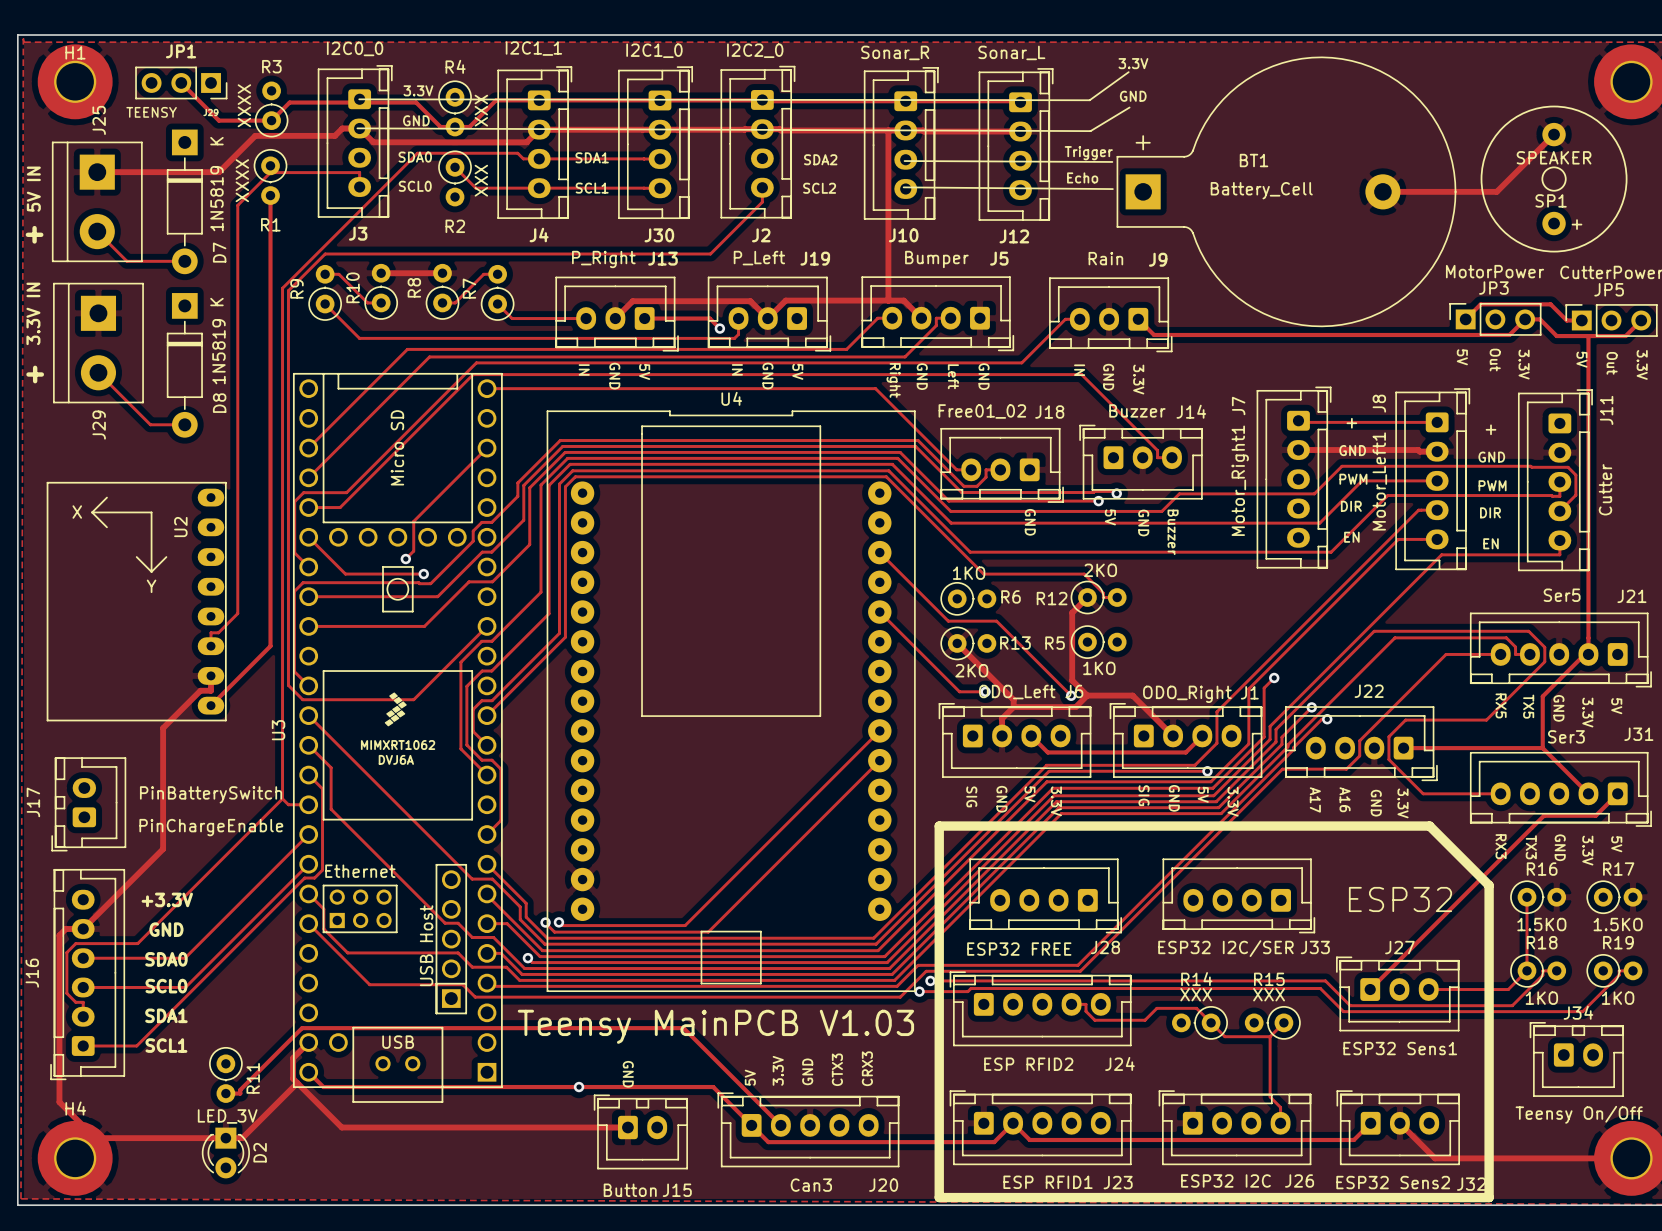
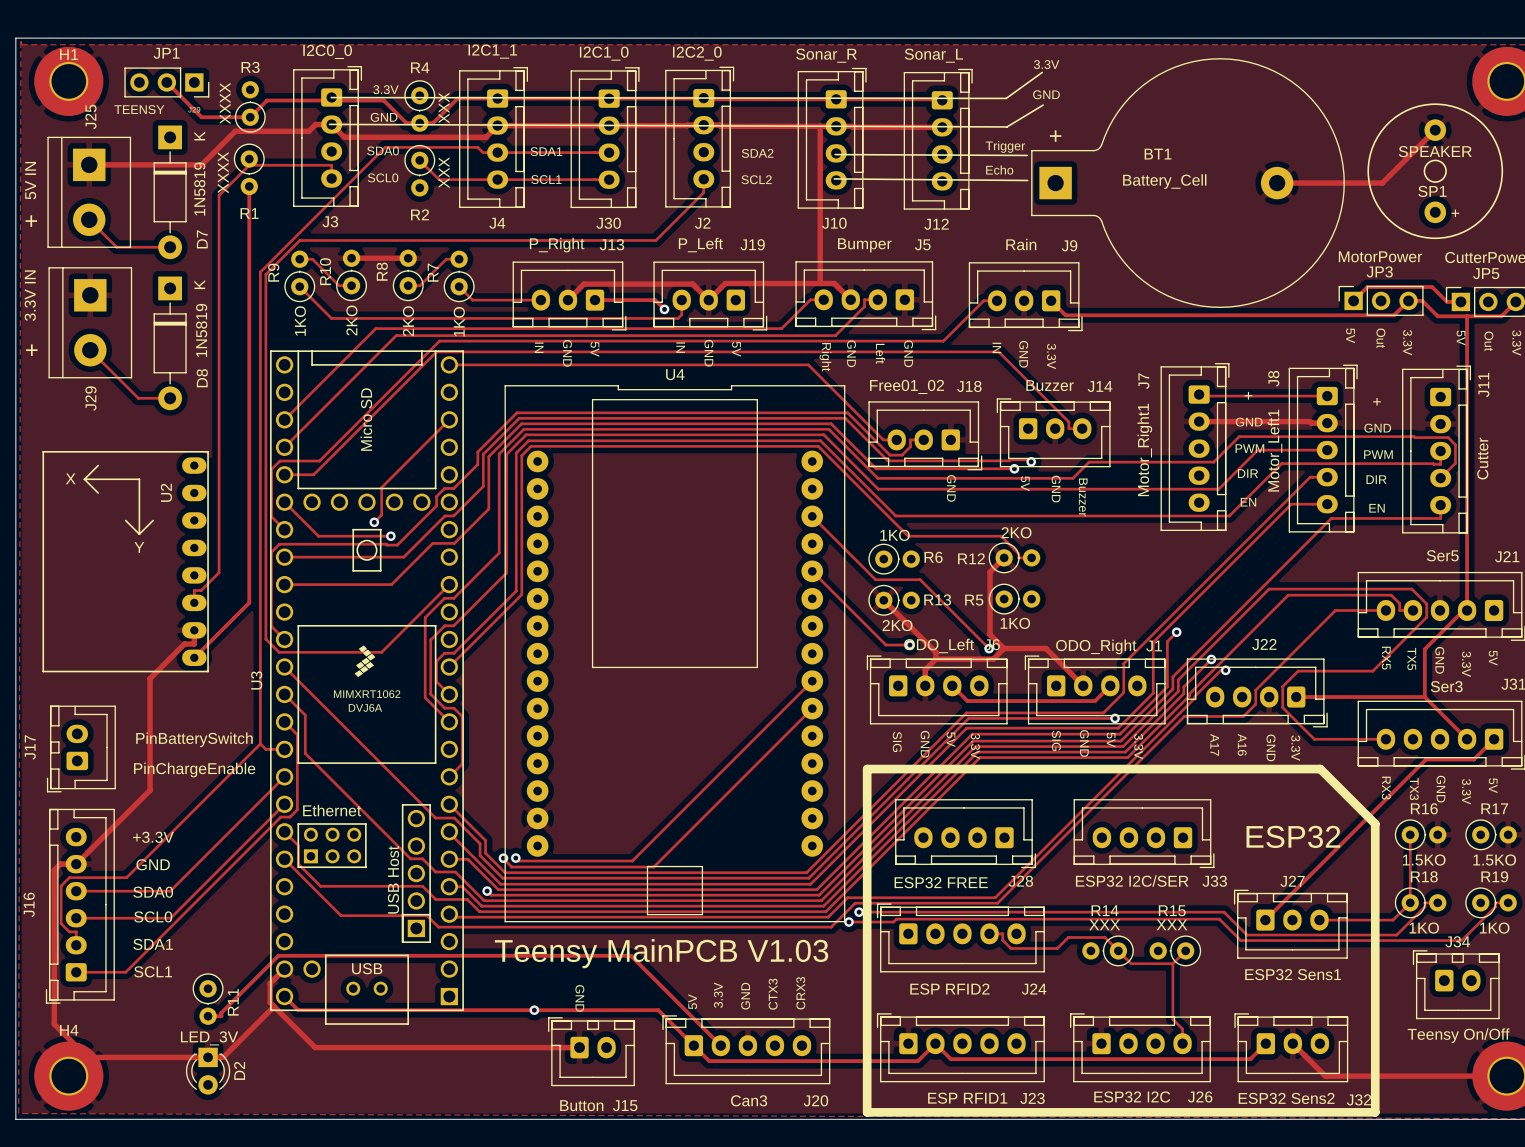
R10 value: none -> 2KO (351, 320)
R9 value: none -> 1KO (300, 321)
R8 value: none -> 2KO (408, 321)
R7 value: none -> 1KO (459, 321)

